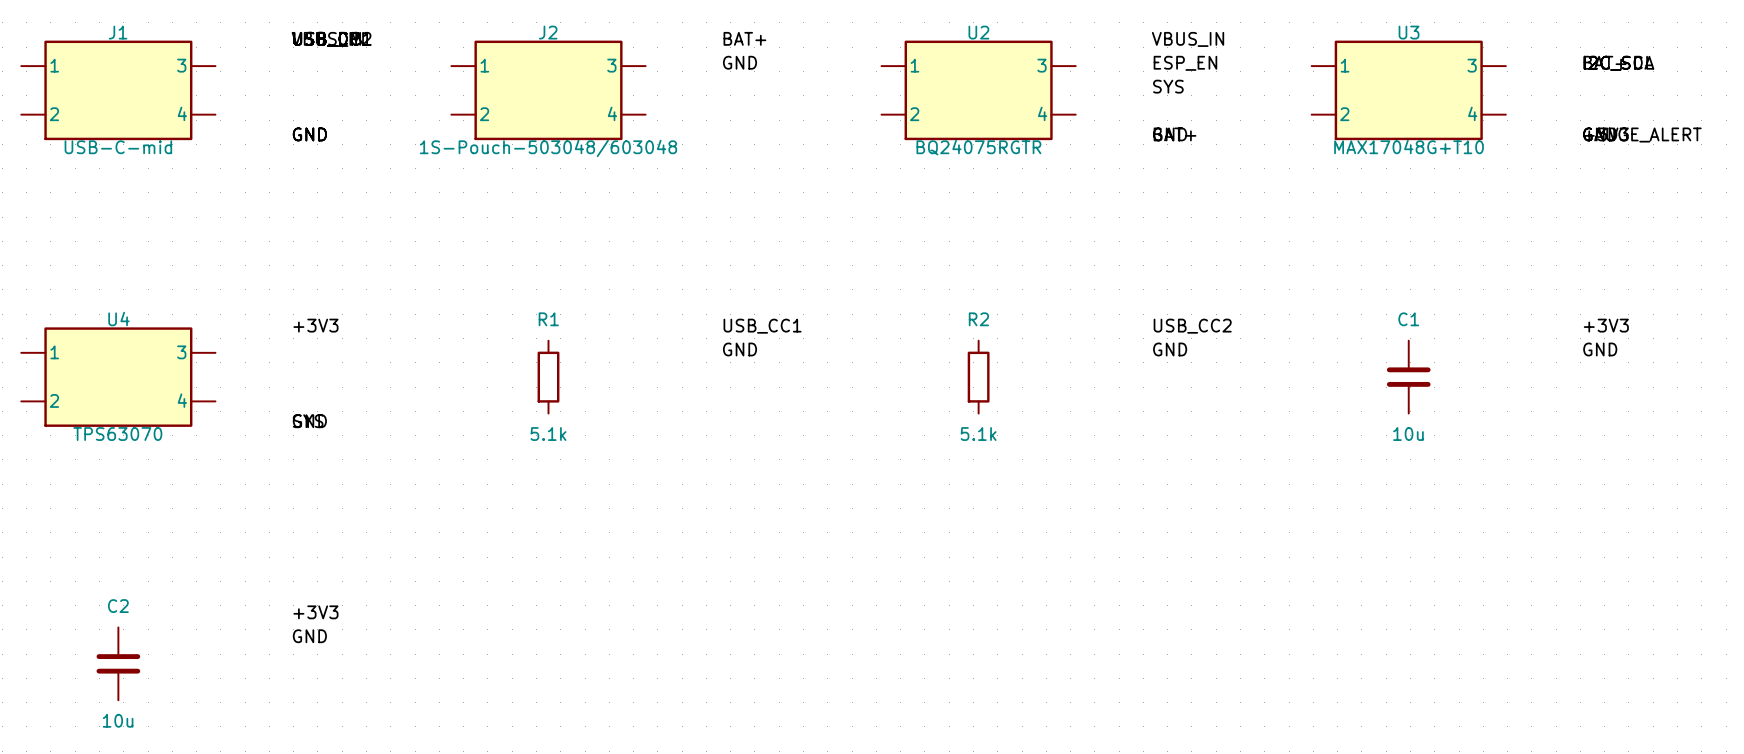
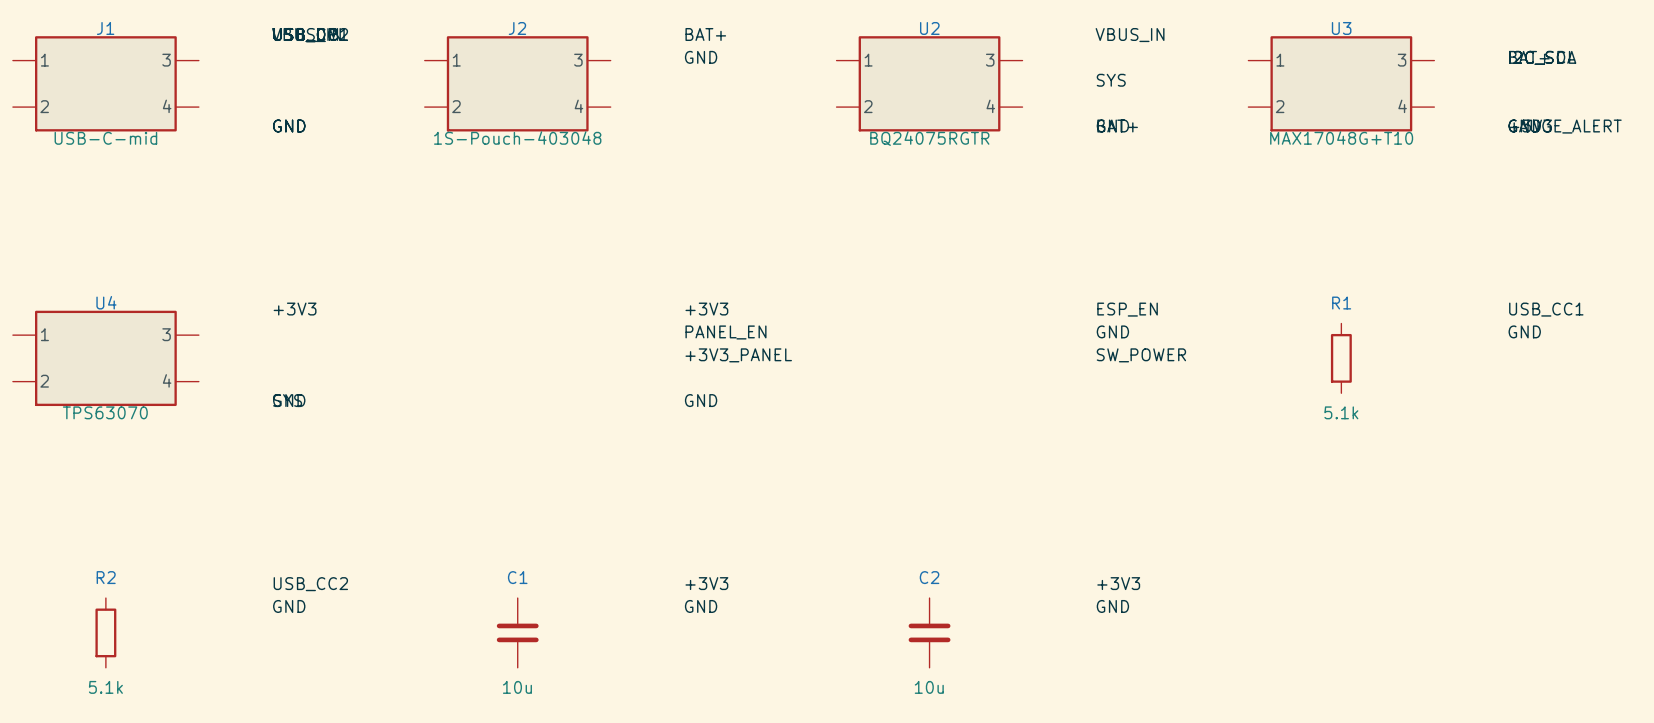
label: ESP_EN (1185, 63) -> none
J2 value: 1S-Pouch-503048/603048 (548, 148) -> 1S-Pouch-403048 (517, 138)
label: +3V3 (1606, 325) -> USB_CC1 (1546, 309)
label: USB_CC1 (762, 326) -> +3V3 (706, 309)
label: USB_CC2 (1192, 326) -> ESP_EN (1127, 309)
label: GND (740, 349) -> PANEL_EN (725, 332)
label: none -> +3V3_PANEL (738, 355)
label: none -> SW_POWER (1141, 355)
R1 position: (548, 377) -> (1341, 358)
R2 position: (978, 377) -> (105, 632)
C1 position: (1408, 377) -> (517, 632)
label: none -> GND (701, 400)
label: +3V3 (315, 612) -> USB_CC2 (310, 584)
label: none -> +3V3 (706, 583)
label: none -> +3V3 (1118, 583)
label: none -> GND (701, 606)
label: none -> GND (1112, 606)
C2 position: (118, 663) -> (929, 632)

